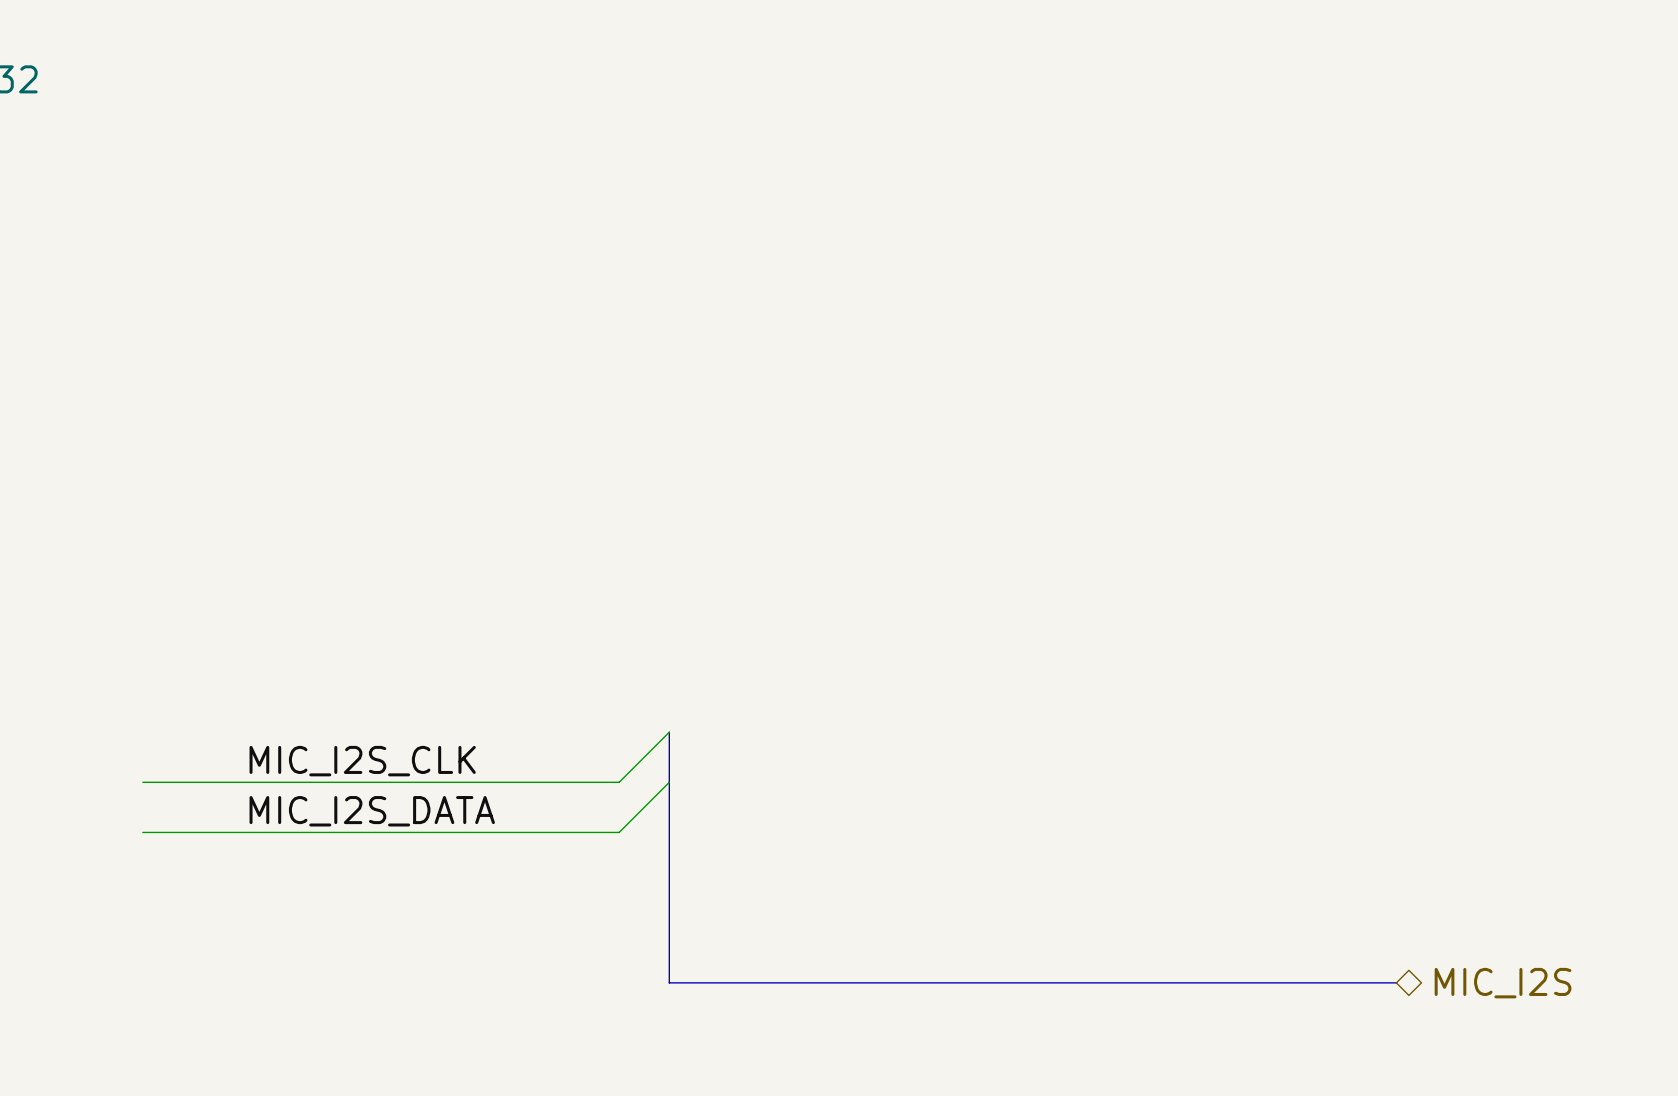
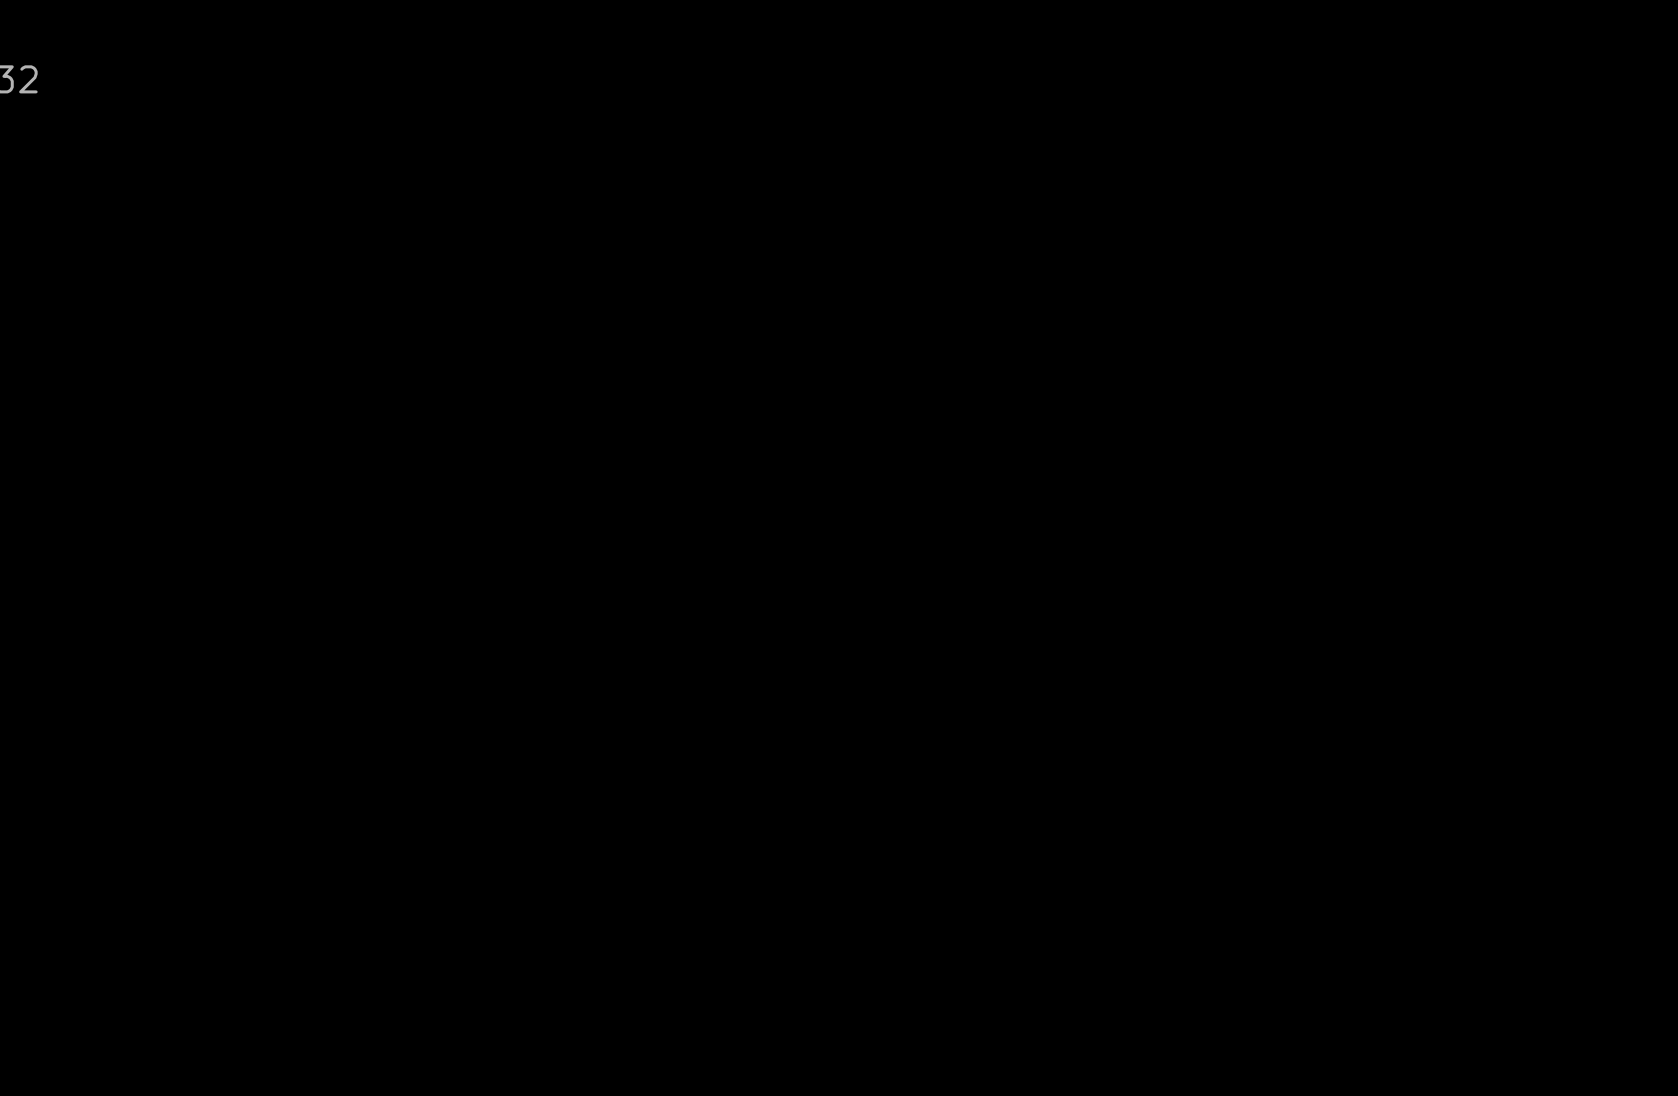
wire: (669, 732) (619, 782) (142, 782) -> none
bus: (669, 732) (669, 982) (1396, 982) -> none
label: MIC_I2S_CLK (362, 761) -> none
wire: (669, 782) (619, 832) (142, 832) -> none
label: MIC_I2S_DATA (372, 811) -> none
hierarchical label: MIC_I2S (1503, 983) -> none

